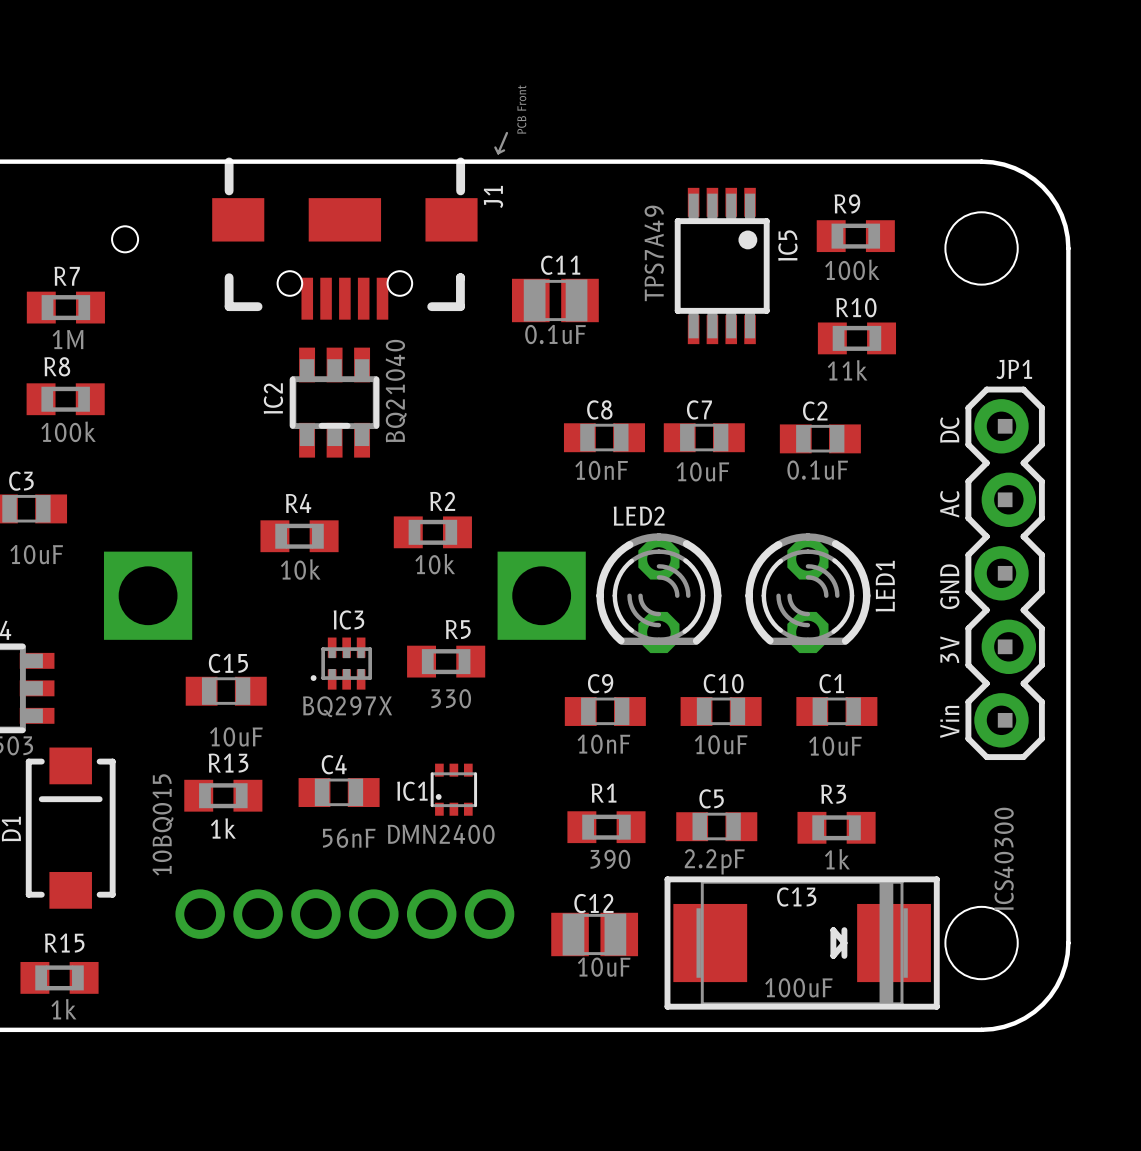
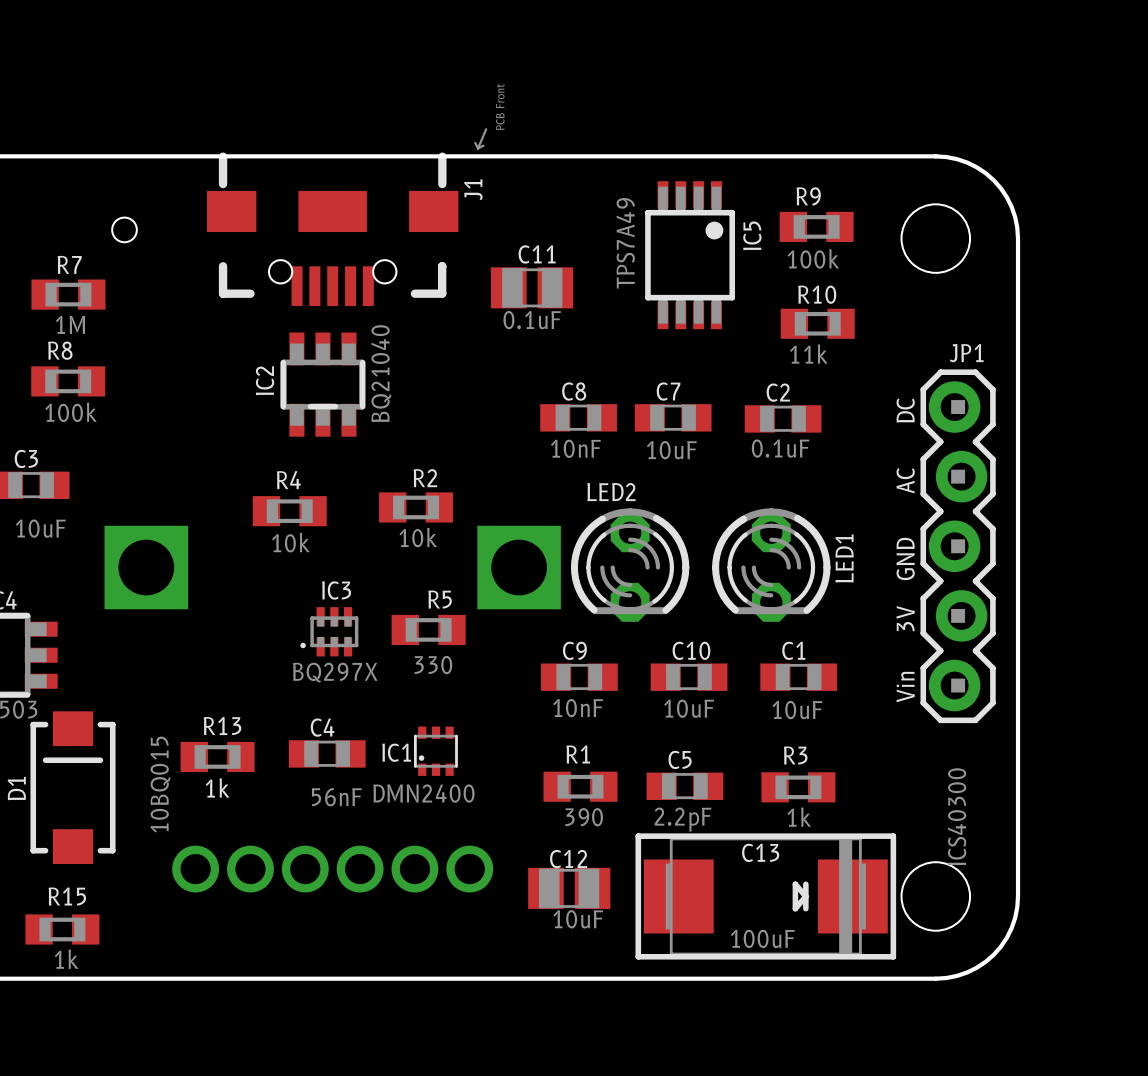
C15: 10uF (226, 691) -> none

